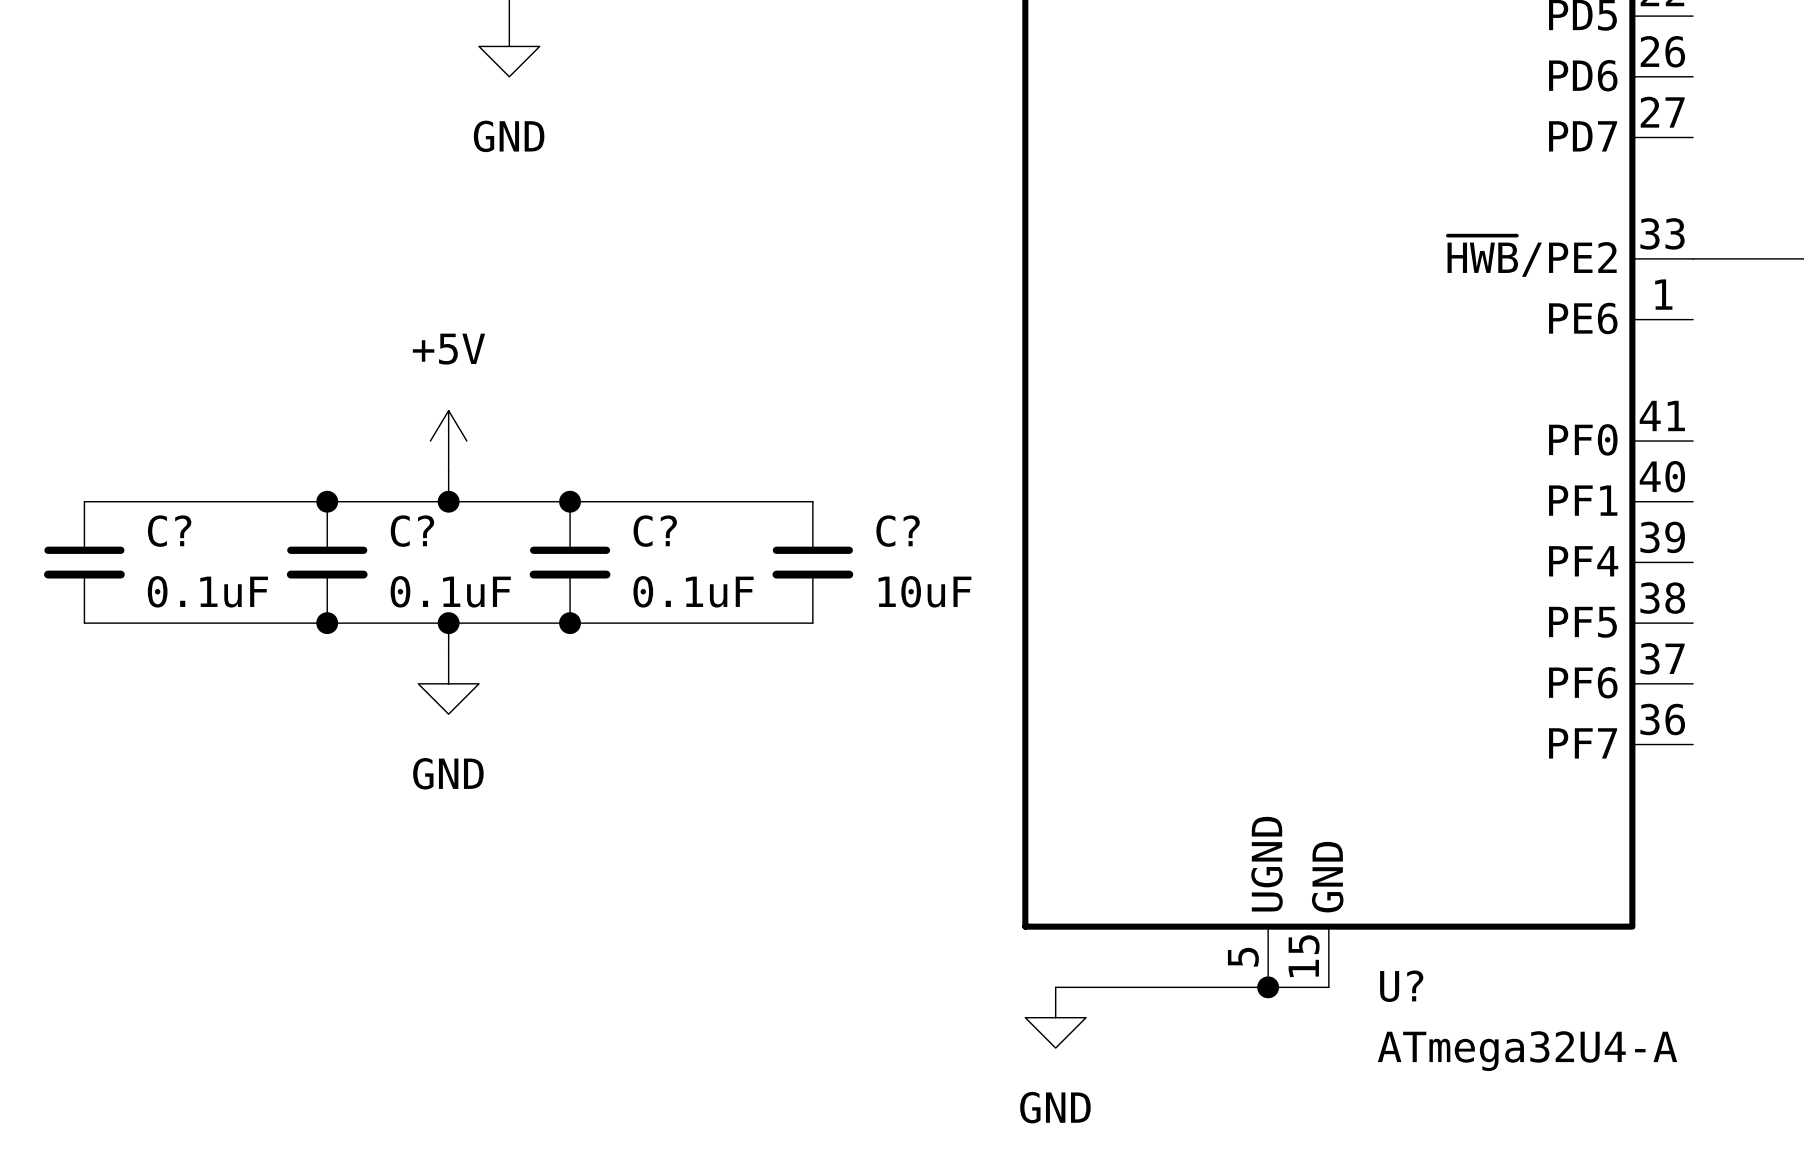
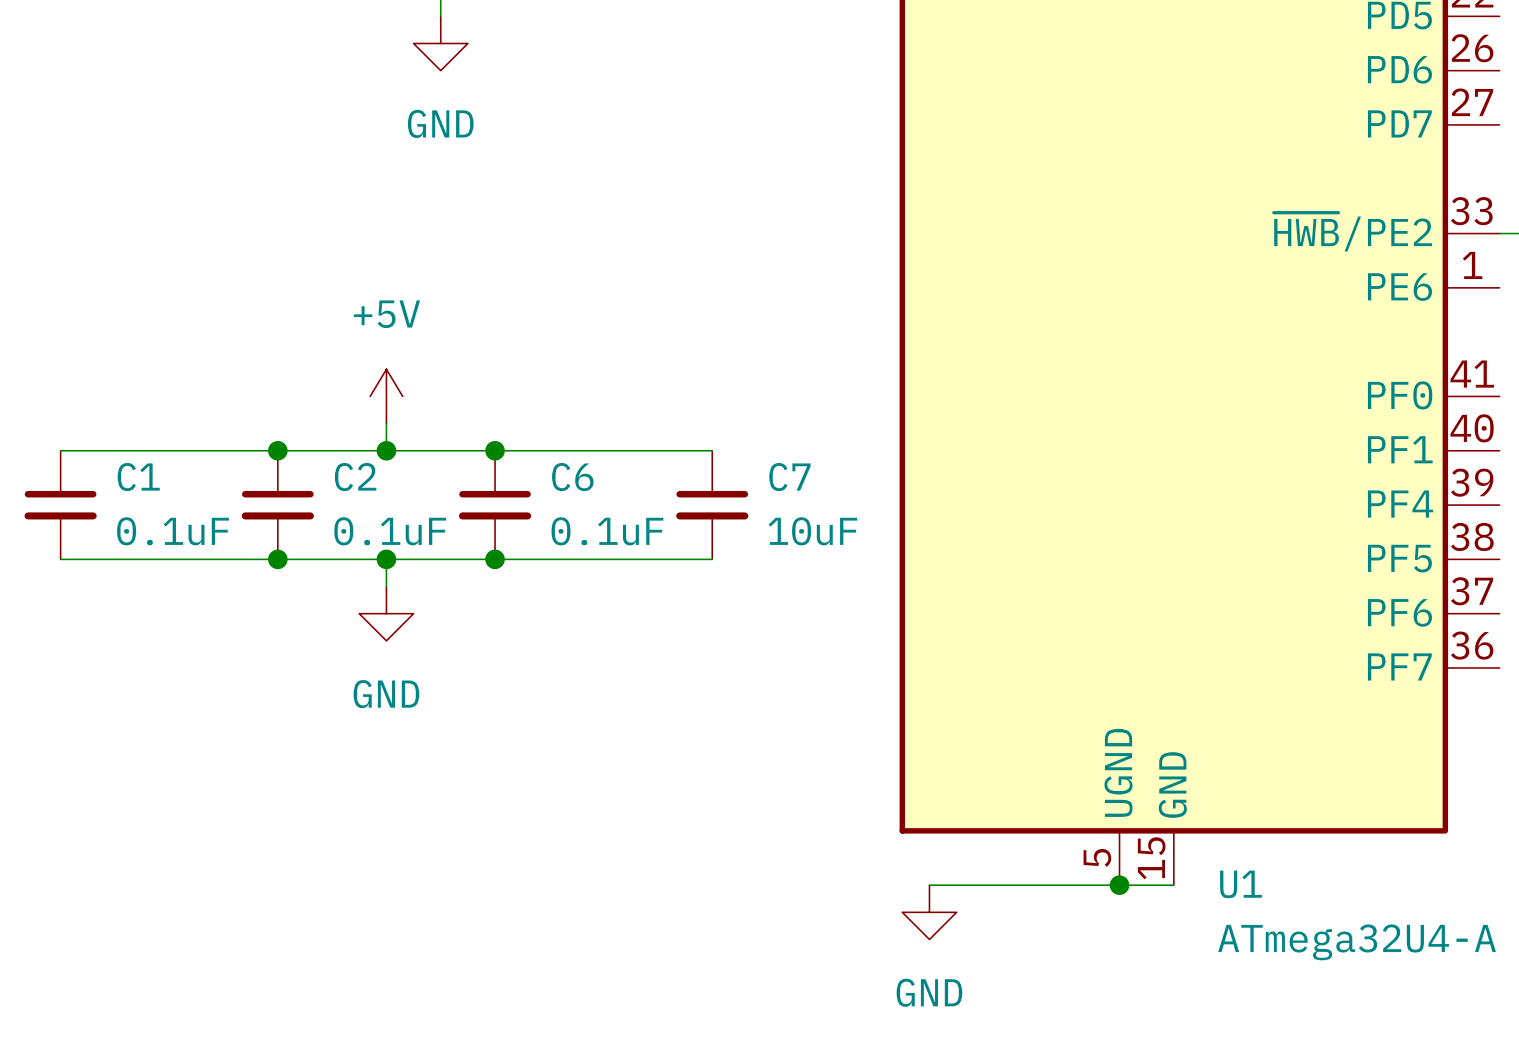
C? name: C? (169, 531) -> C1 (138, 477)
C? name: C? (412, 531) -> C2 (355, 477)
C? name: C? (655, 531) -> C6 (572, 477)
C? name: C? (898, 531) -> C7 (789, 477)
U? name: U? (1401, 986) -> U1 (1240, 884)

